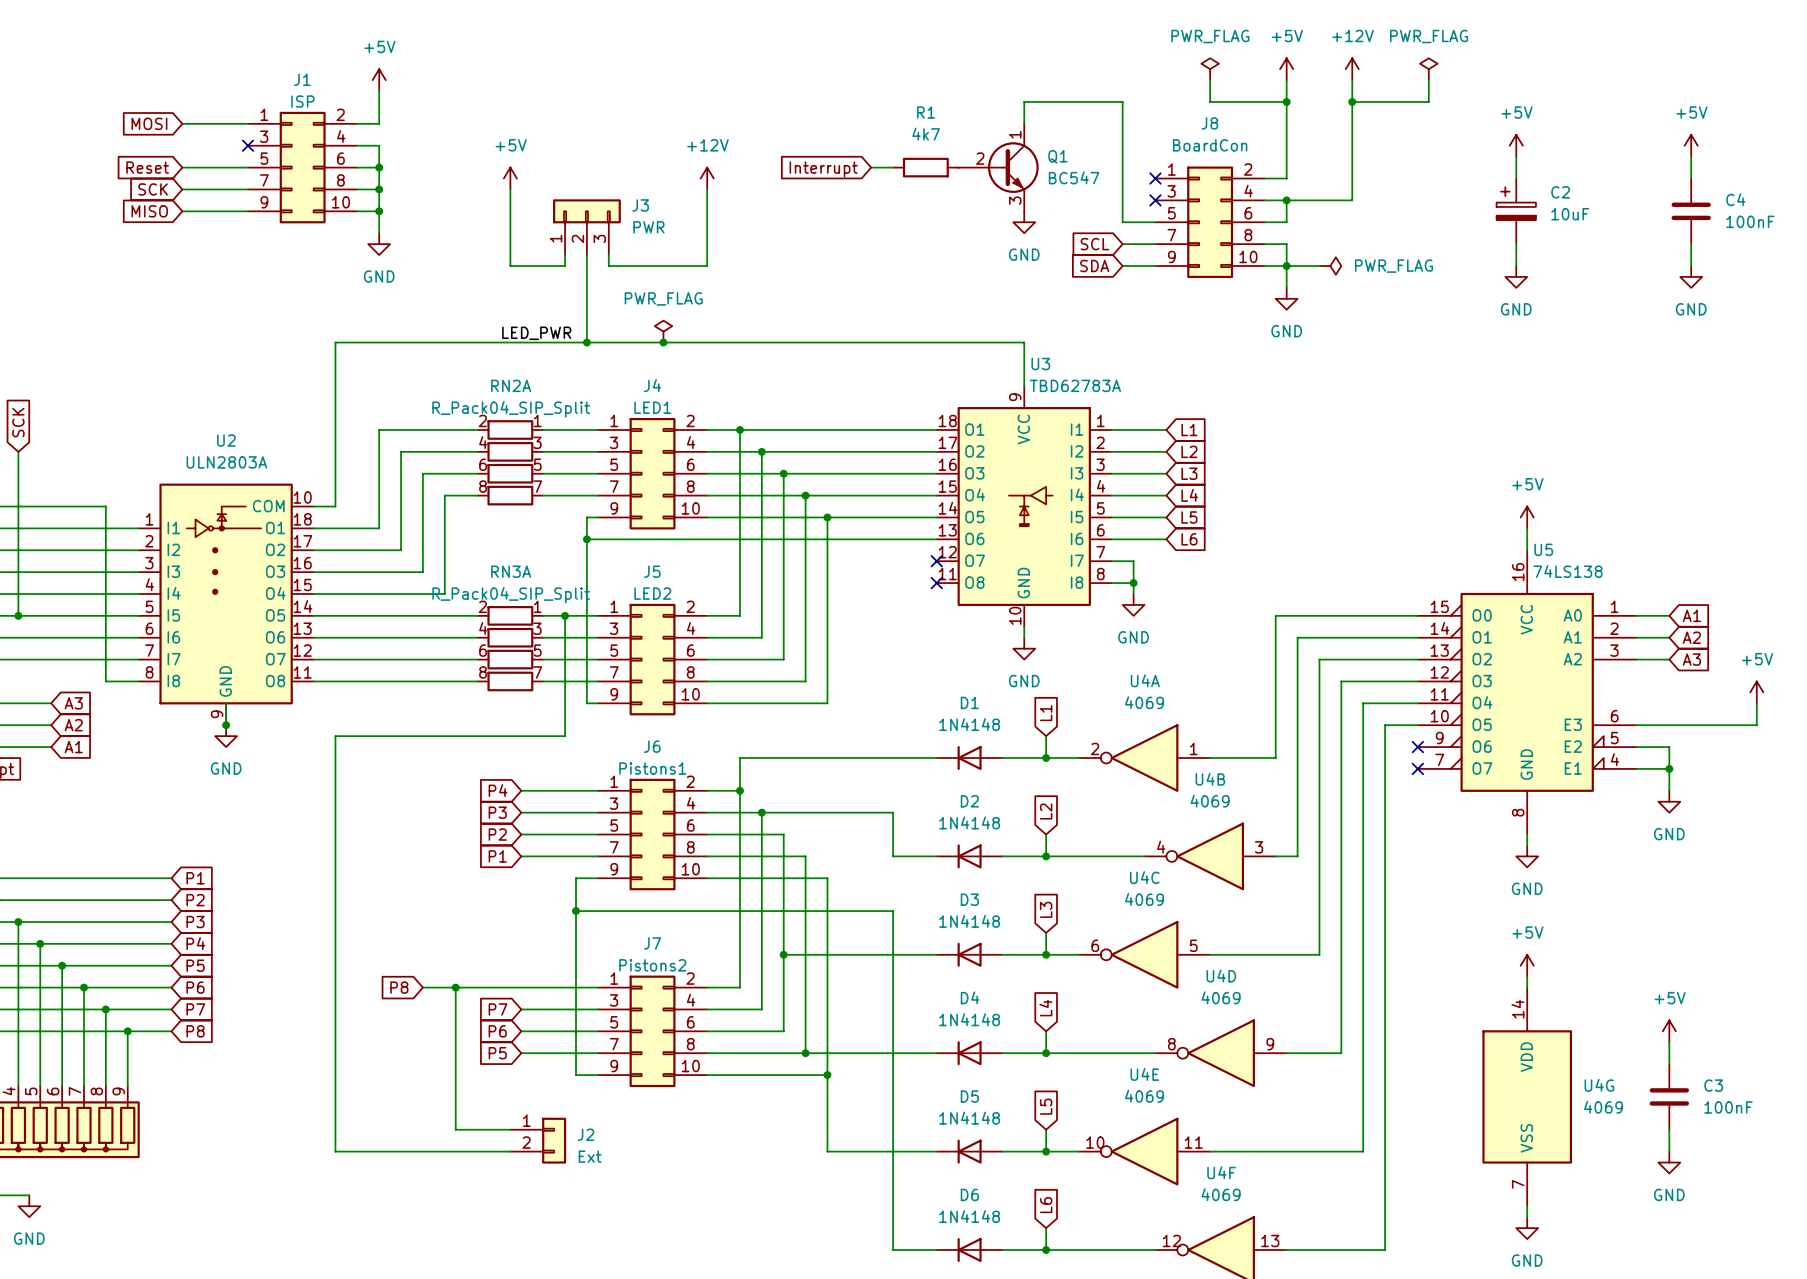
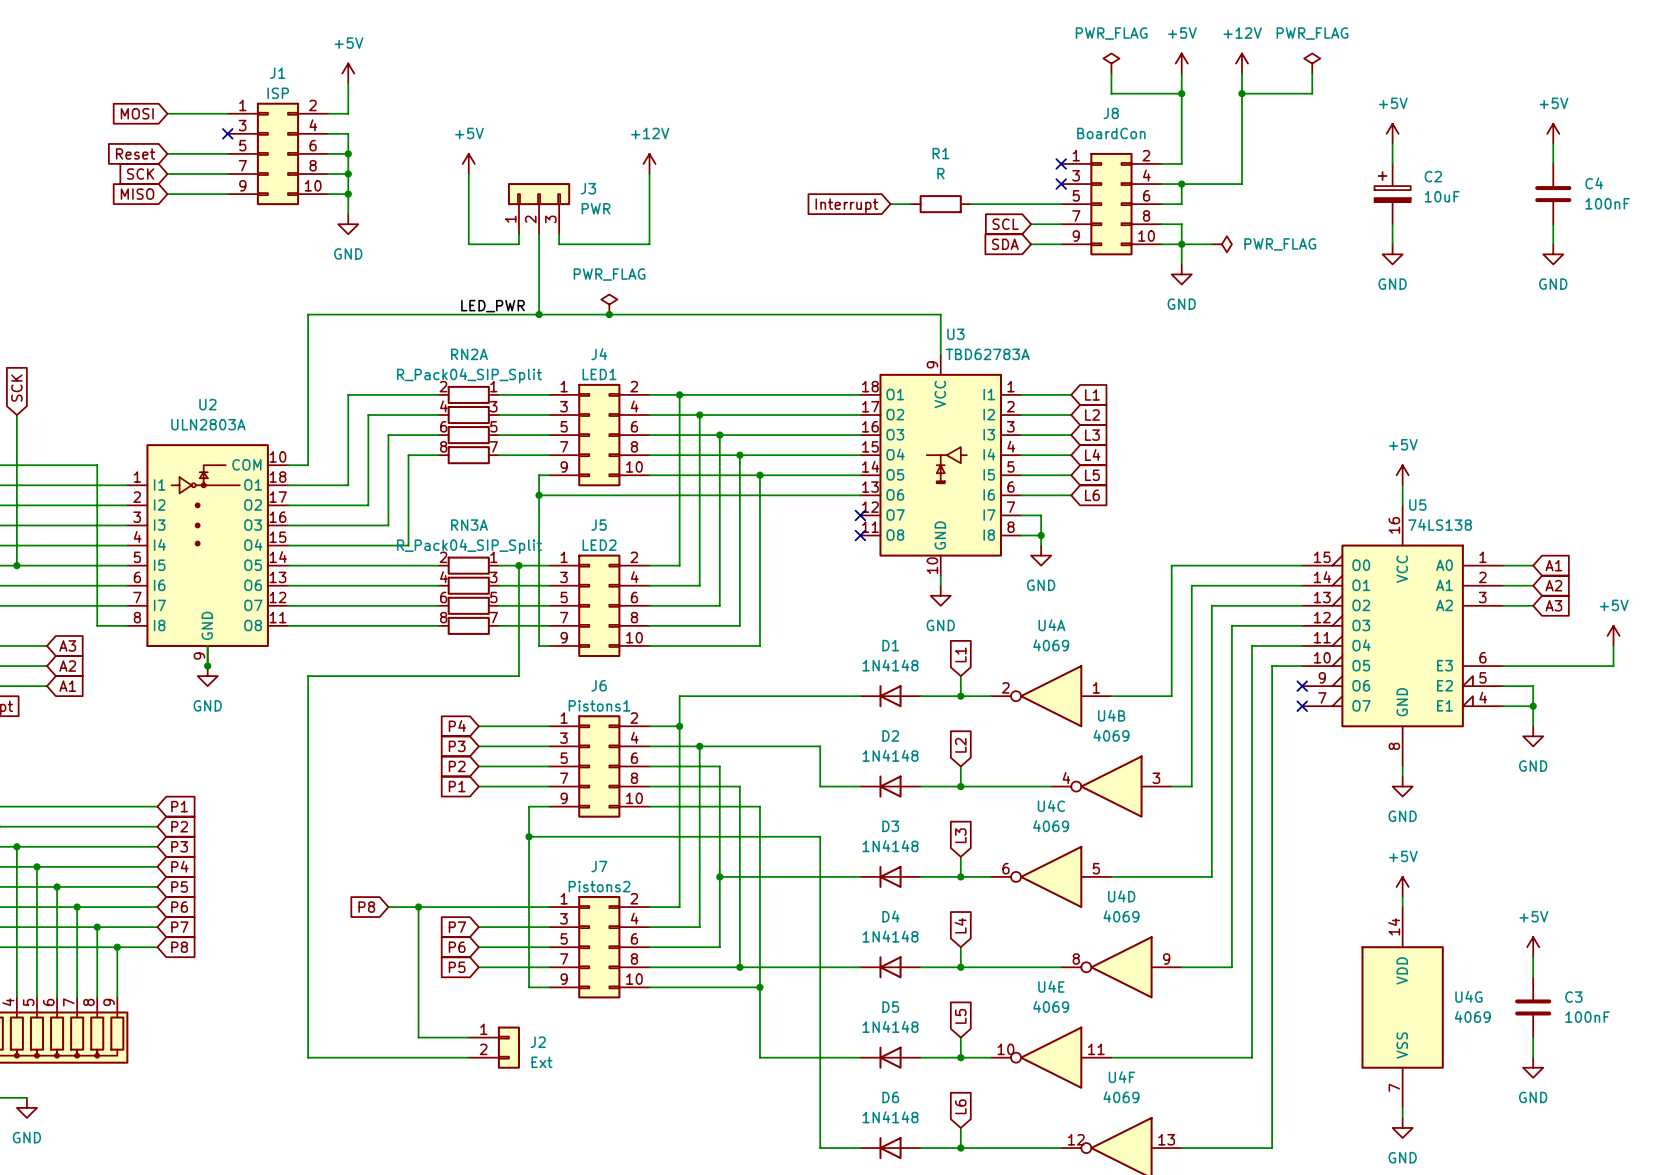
wire: (1024, 123) (1024, 101) (1122, 101) (1122, 222) -> (970, 204) (1031, 204)
R1 value: 4k7 (926, 134) -> R (940, 173)
wire: (871, 167) (893, 167) -> (890, 204) (910, 204)
R1 position: (925, 167) -> (940, 204)
Q1: BC547 (998, 167) -> none
global label position: Interrupt (823, 169) -> Interrupt (846, 205)
power symbol: GND (1024, 222) -> none

